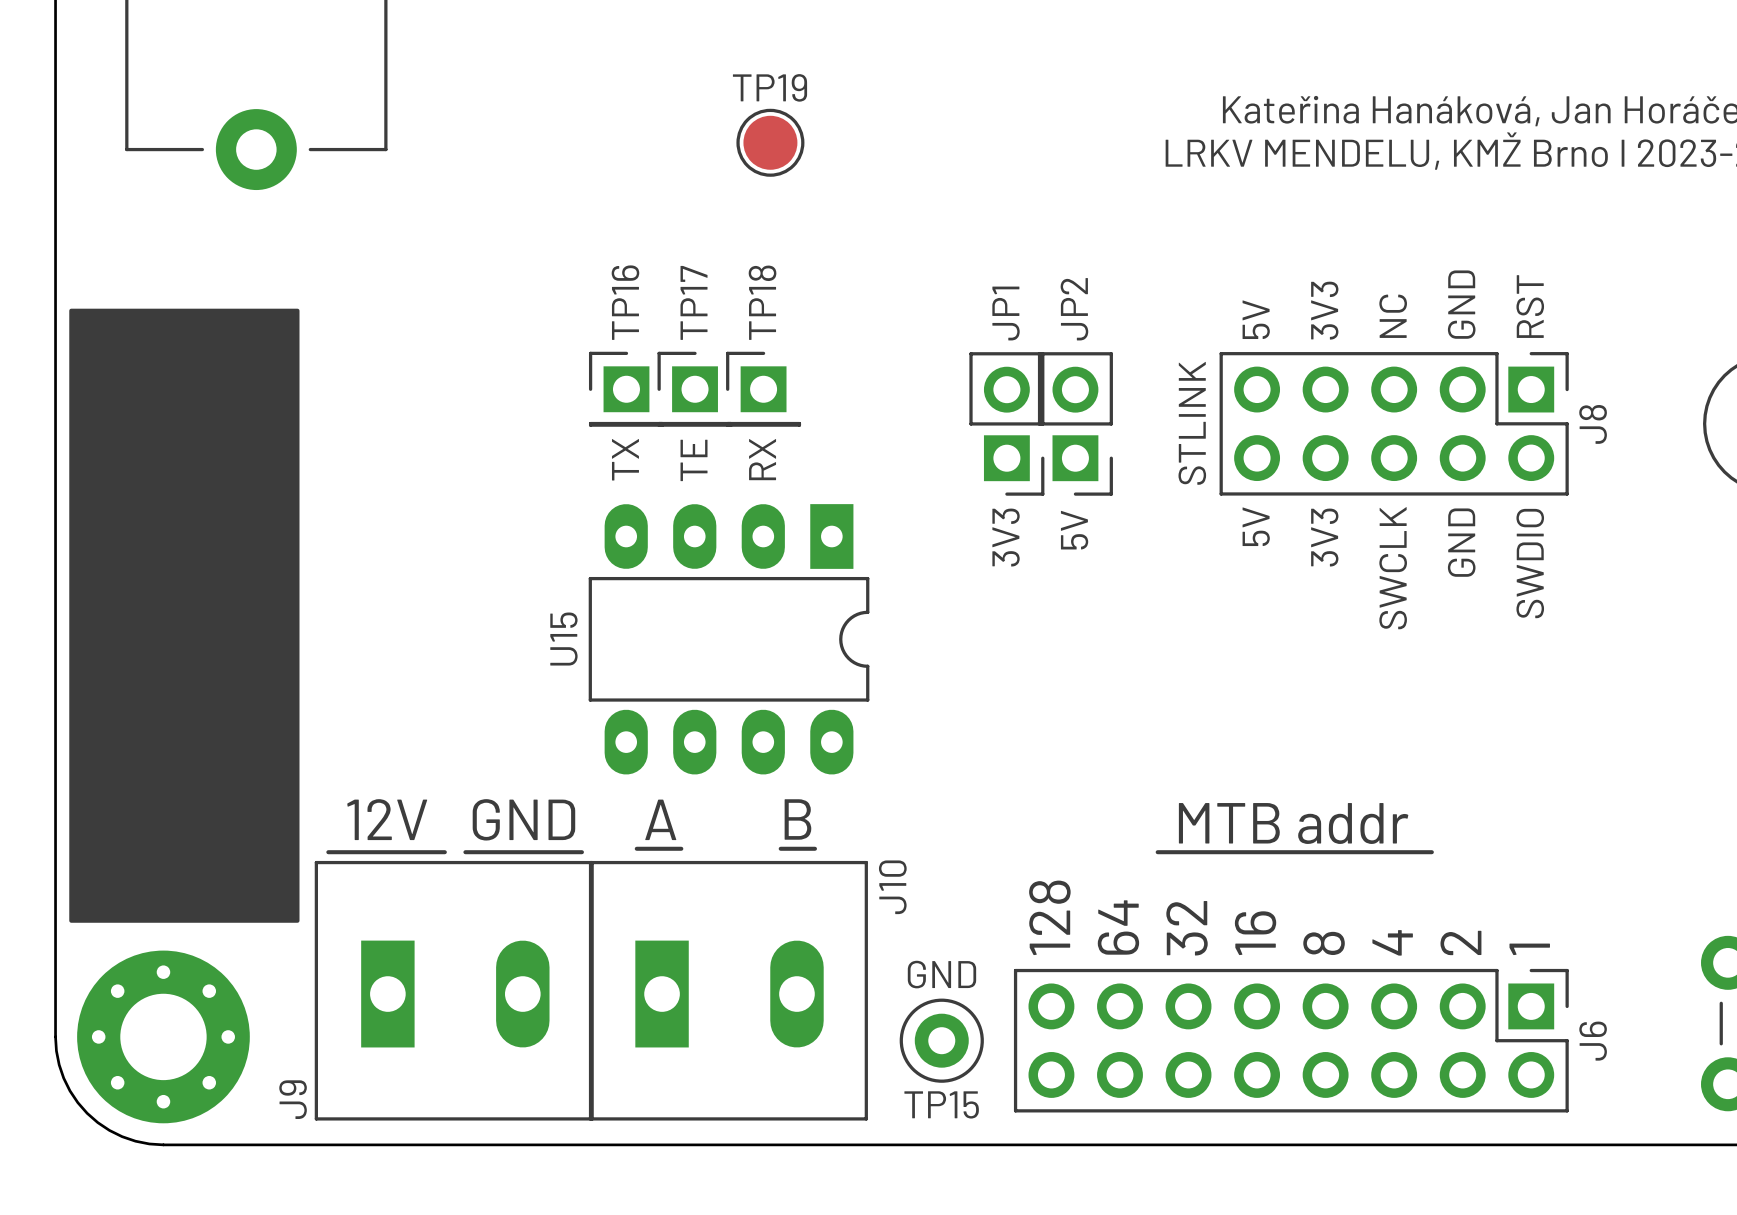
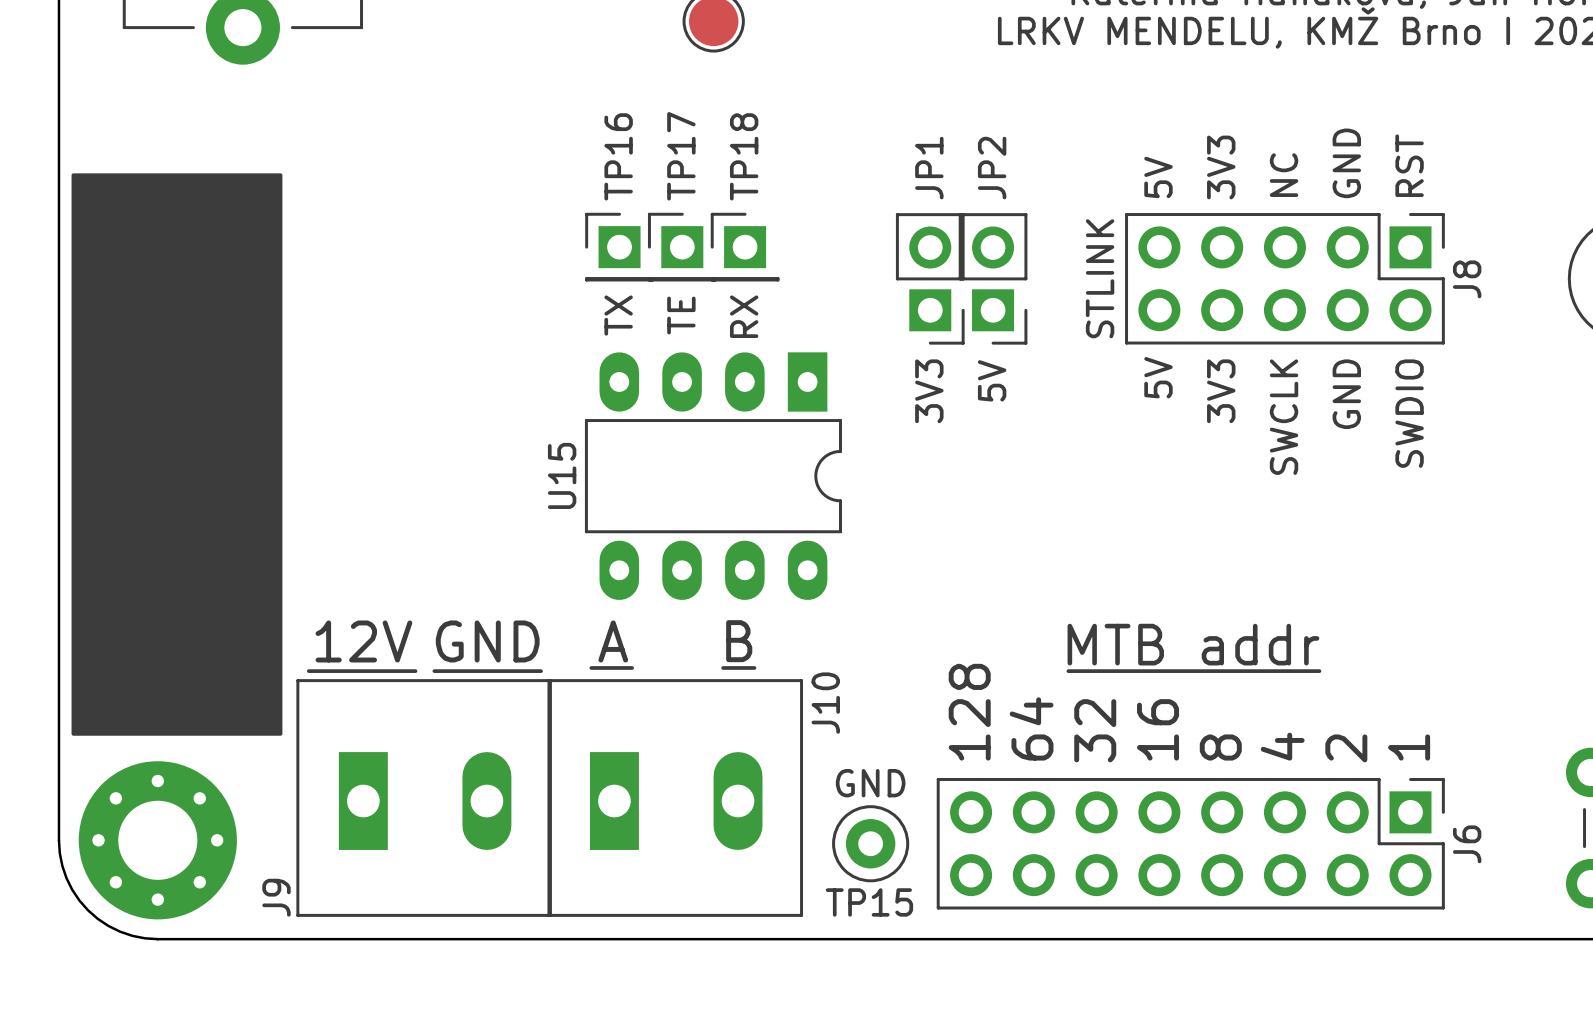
TP16 position: (626, 389) -> (619, 247)
TP17 position: (695, 389) -> (682, 247)
TP18 position: (763, 389) -> (745, 247)
text position: TX (625, 459) -> TX (618, 315)
text position: RX (762, 459) -> RX (744, 316)
text position: TE (694, 460) -> TE (681, 315)
U15 position: (729, 639) -> (713, 476)

